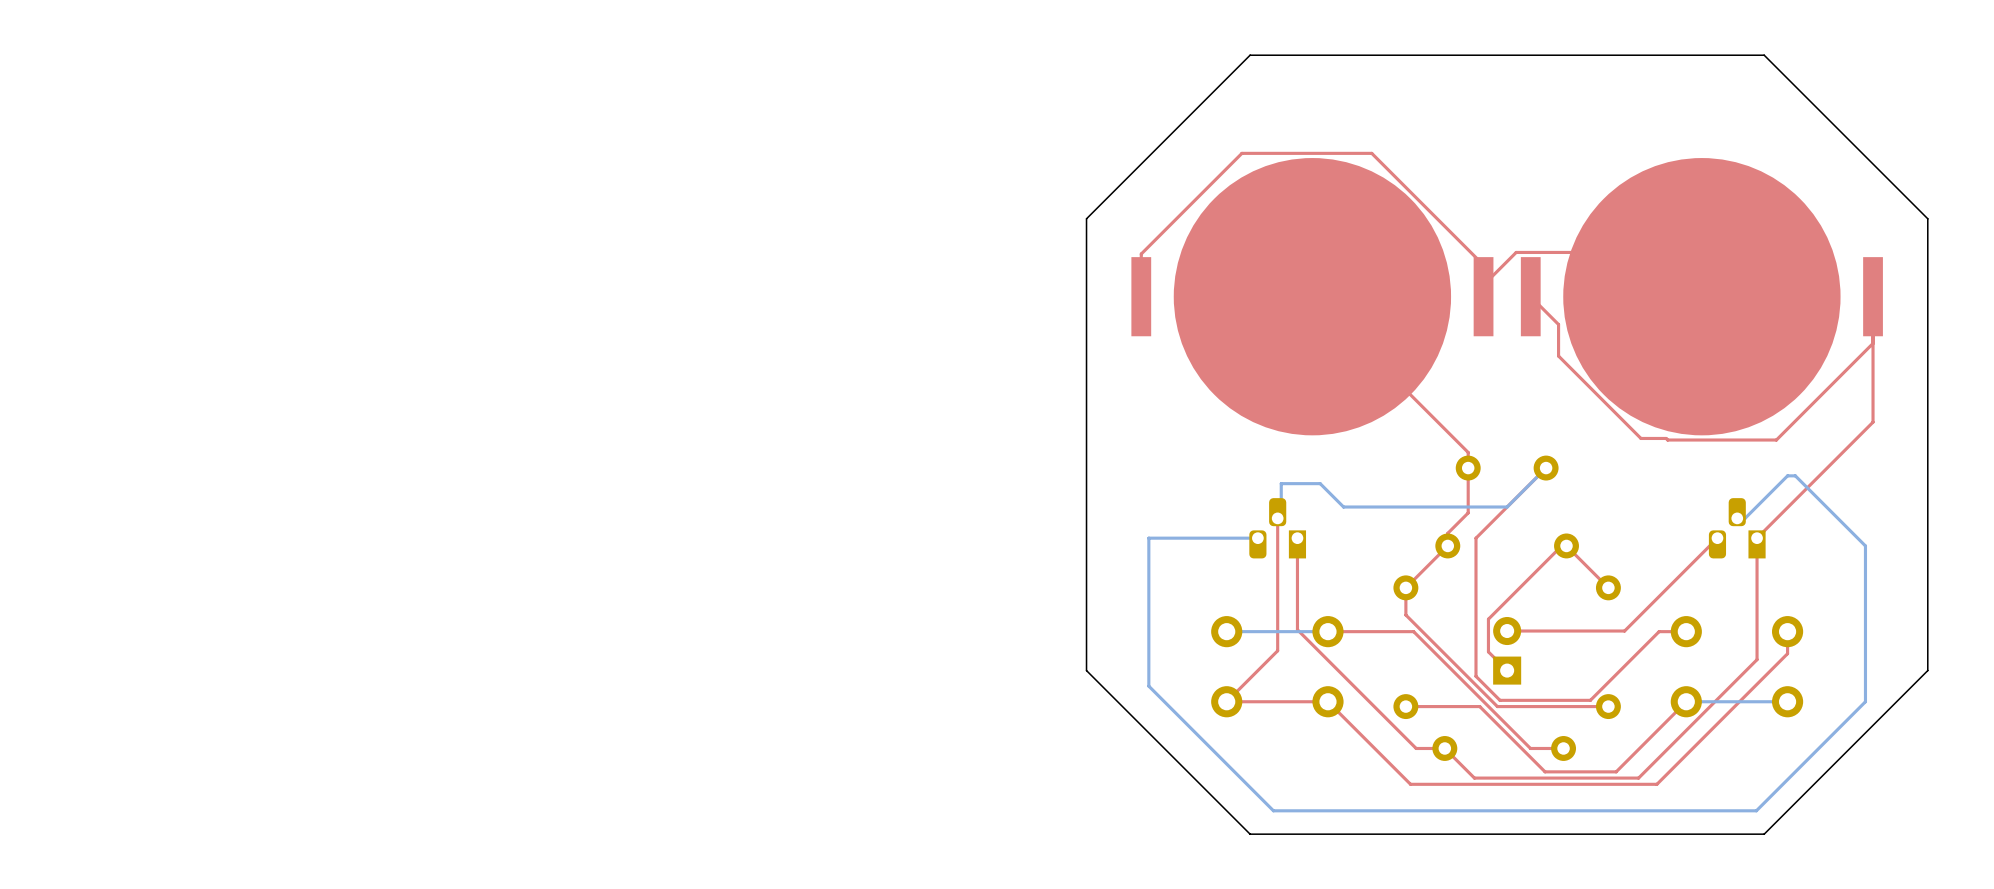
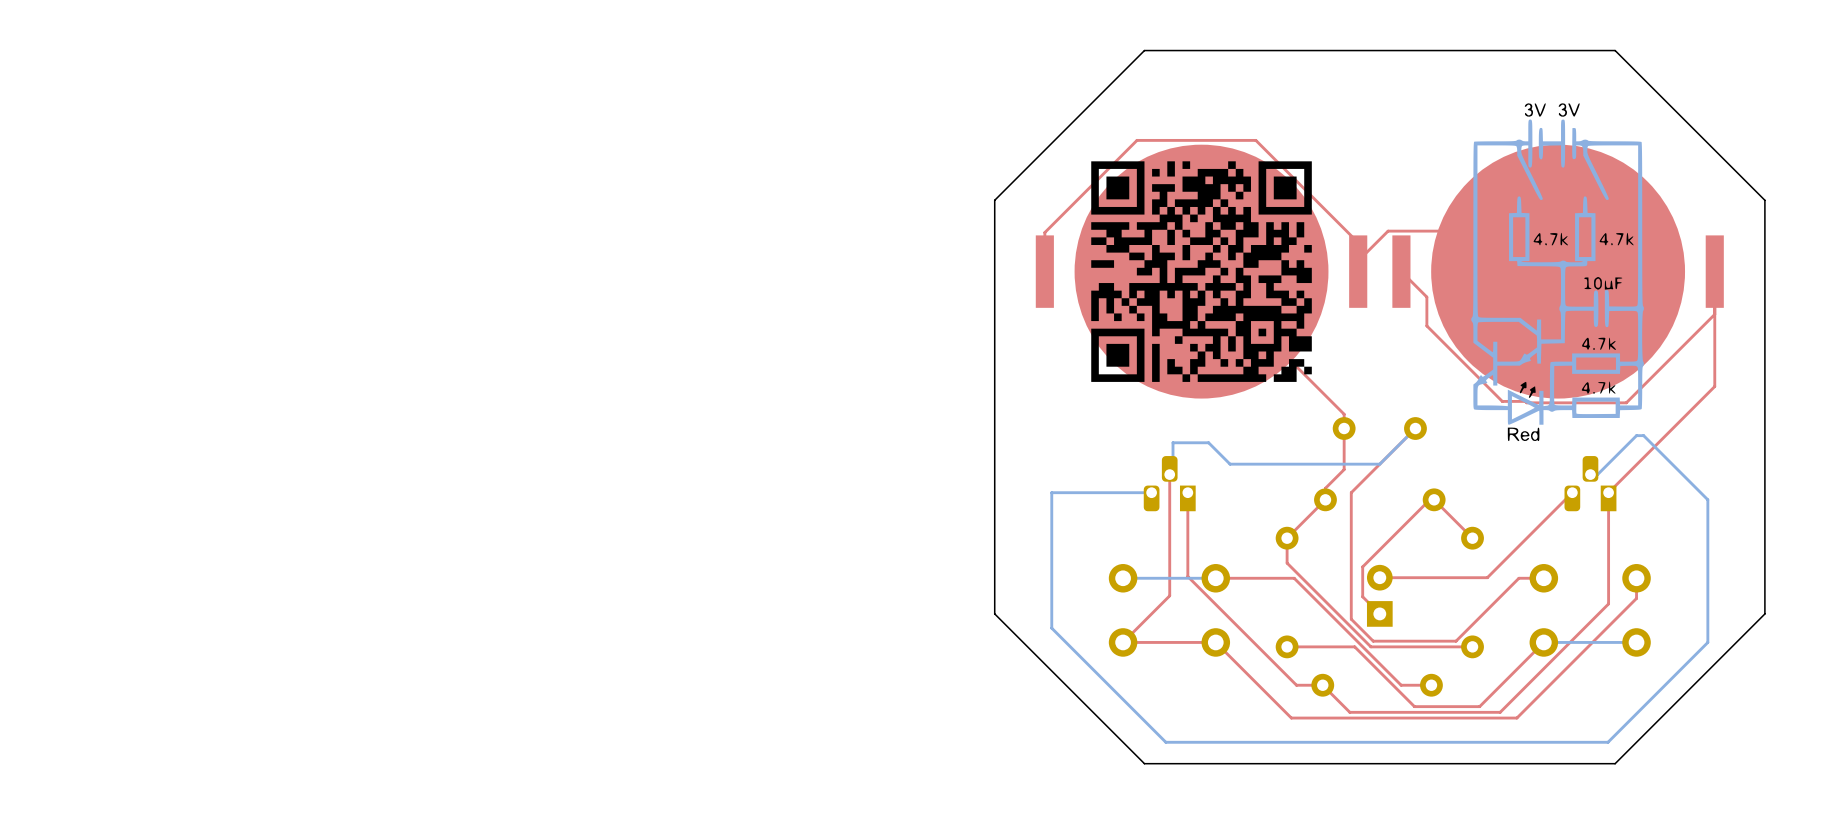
drawing: none -> [1471, 103, 1644, 442]
drawing: none -> [1091, 161, 1312, 382]

